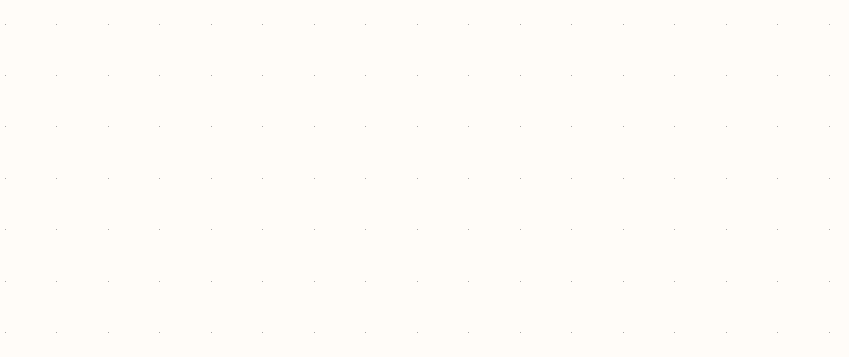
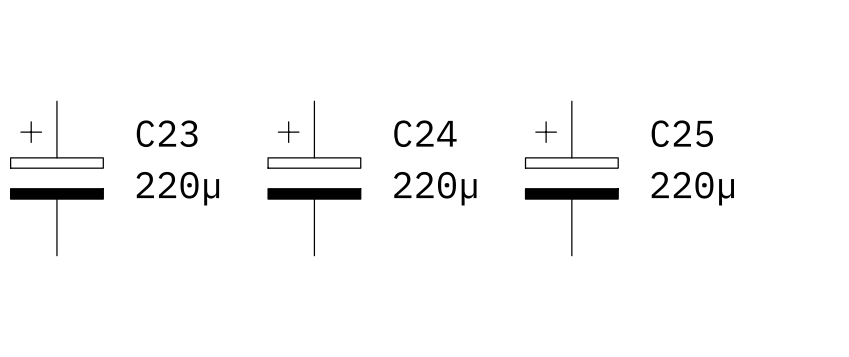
C23: none -> 220µ (56, 178)
C24: none -> 220µ (314, 178)
C25: none -> 220µ (571, 178)

